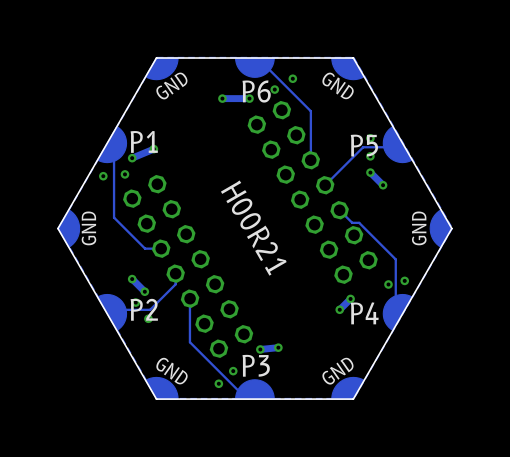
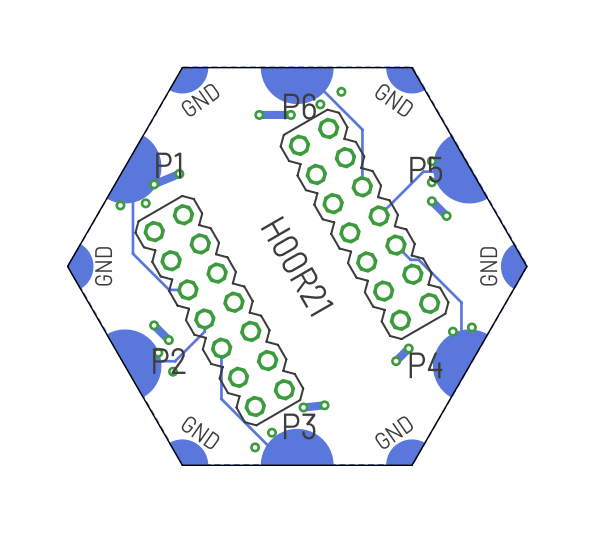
part footprint: [57, 57, 453, 400] -> [66, 66, 528, 466]
part footprint: [247, 100, 378, 284] -> [279, 108, 450, 341]
part footprint: [123, 174, 254, 358] -> [134, 194, 305, 427]

